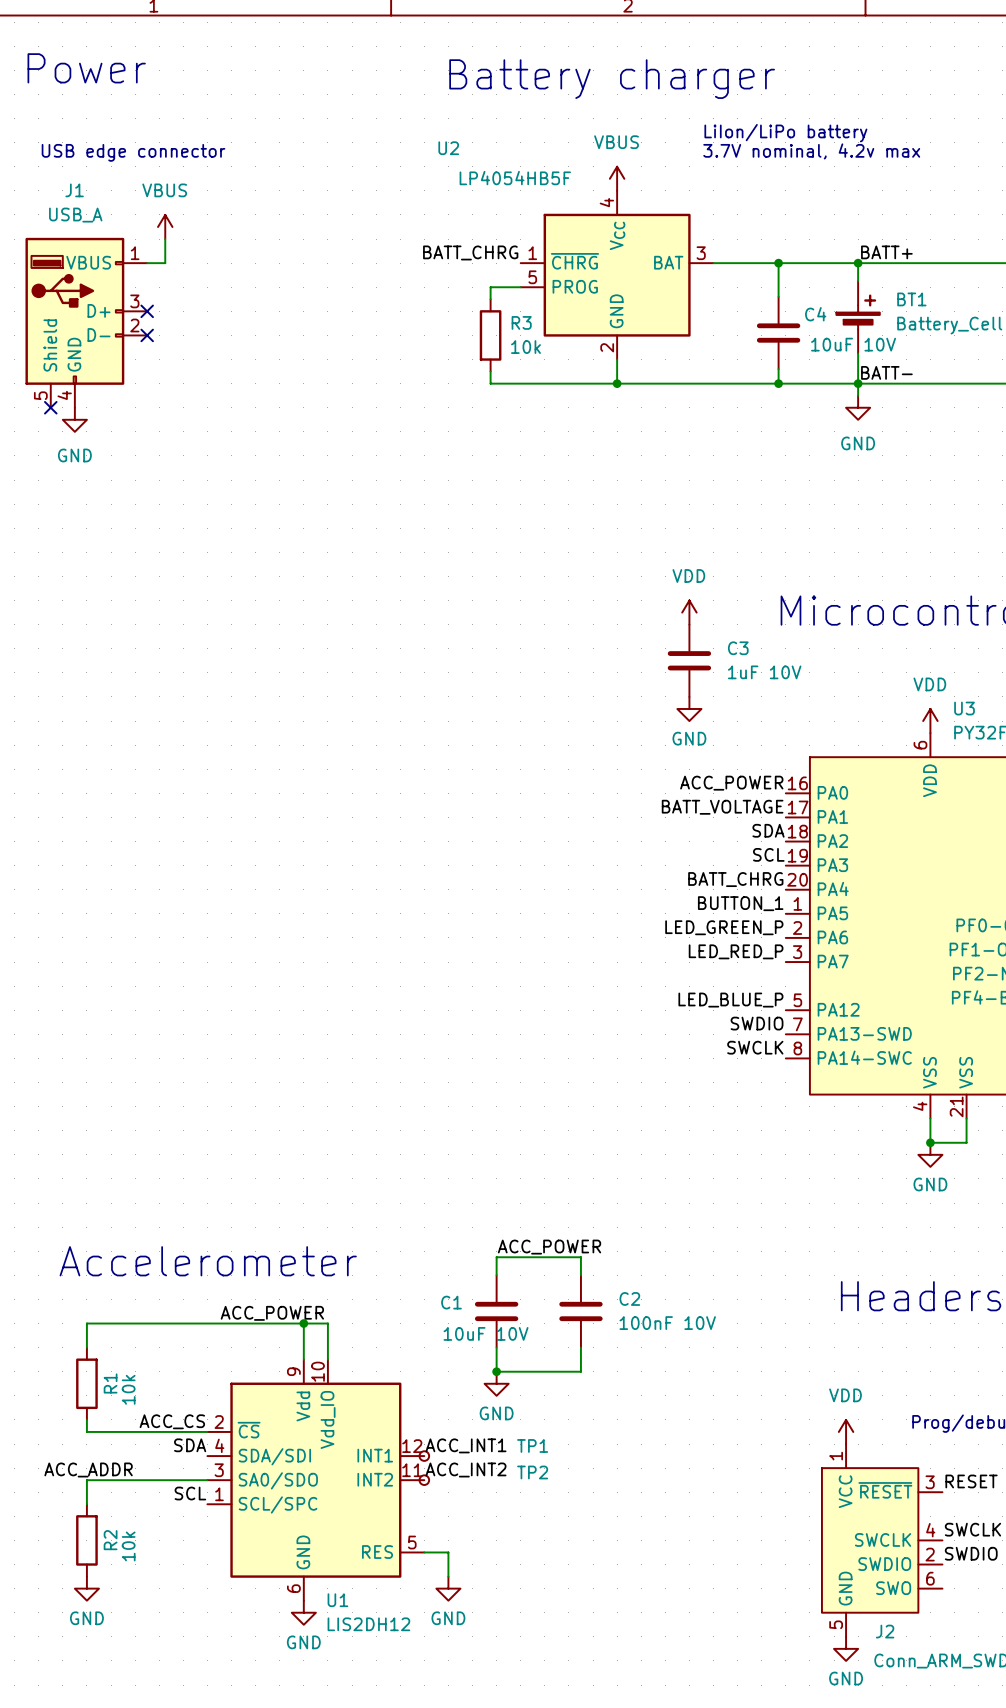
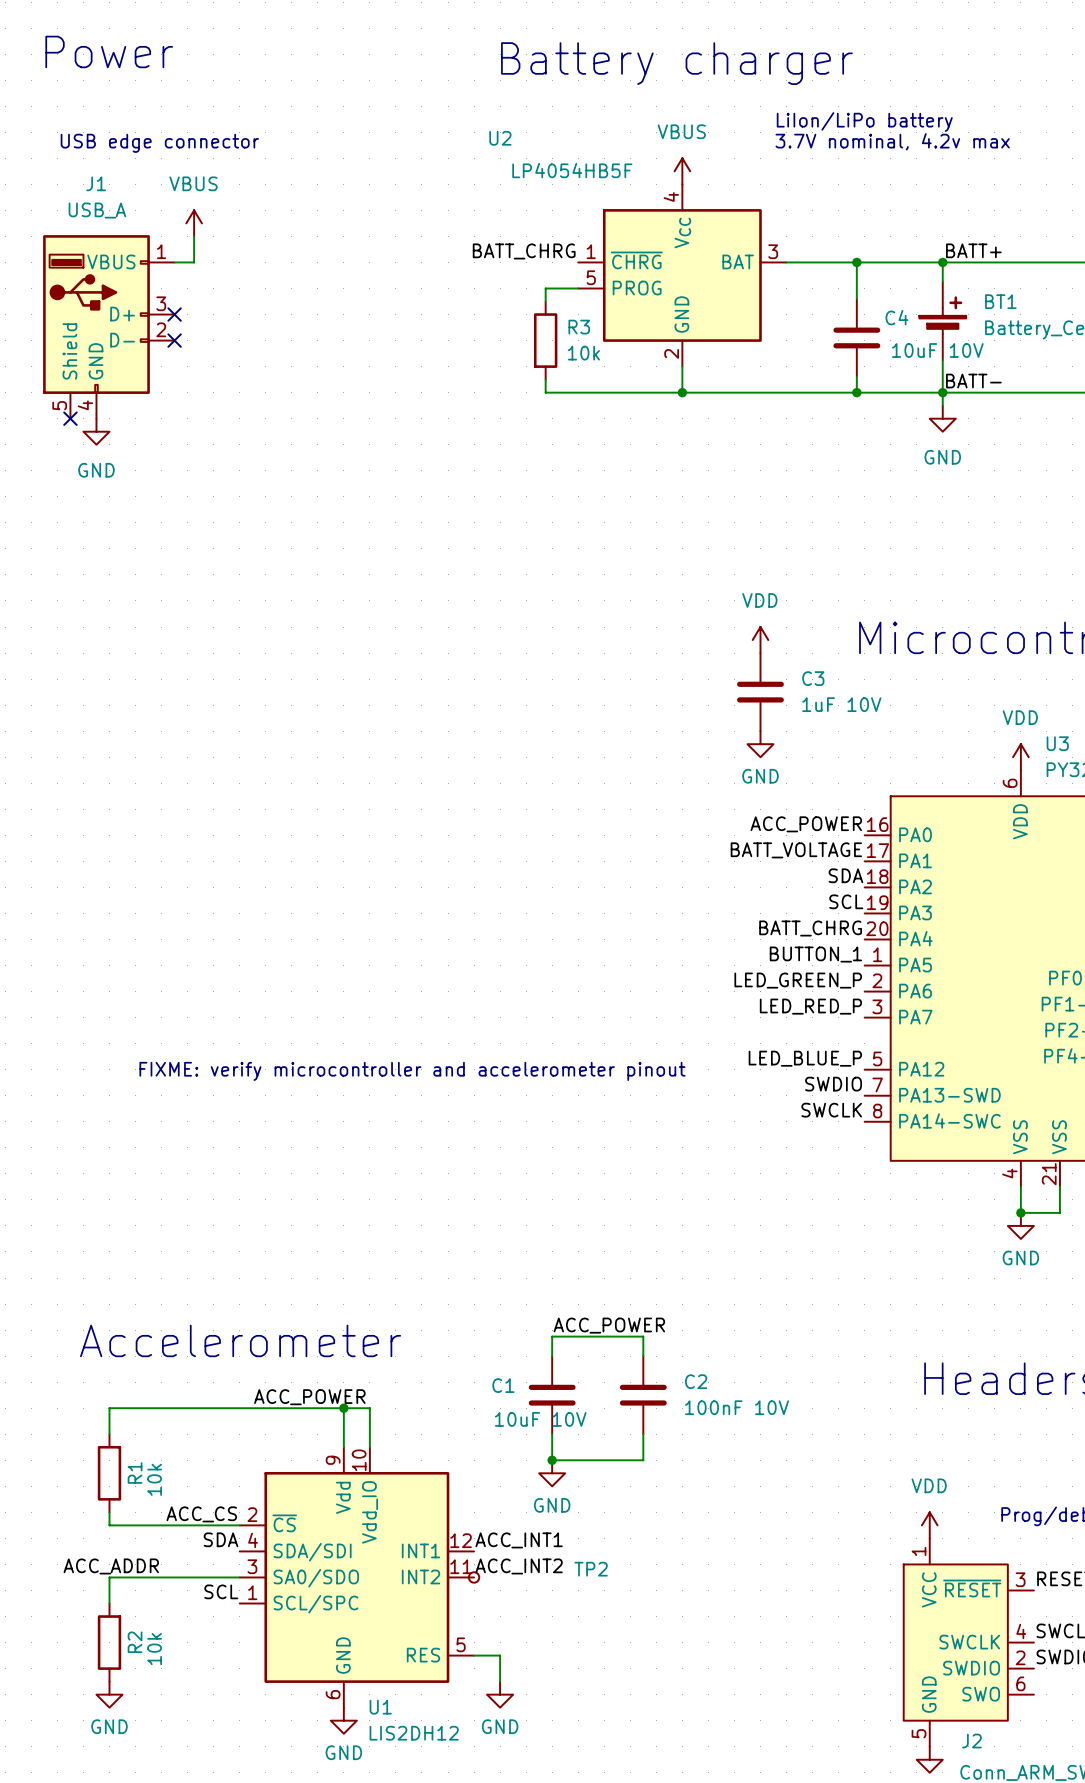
text: none -> FIXME: verify microcontroller and accelerometer pinout (412, 1071)
TP1: (424, 1456) -> none

